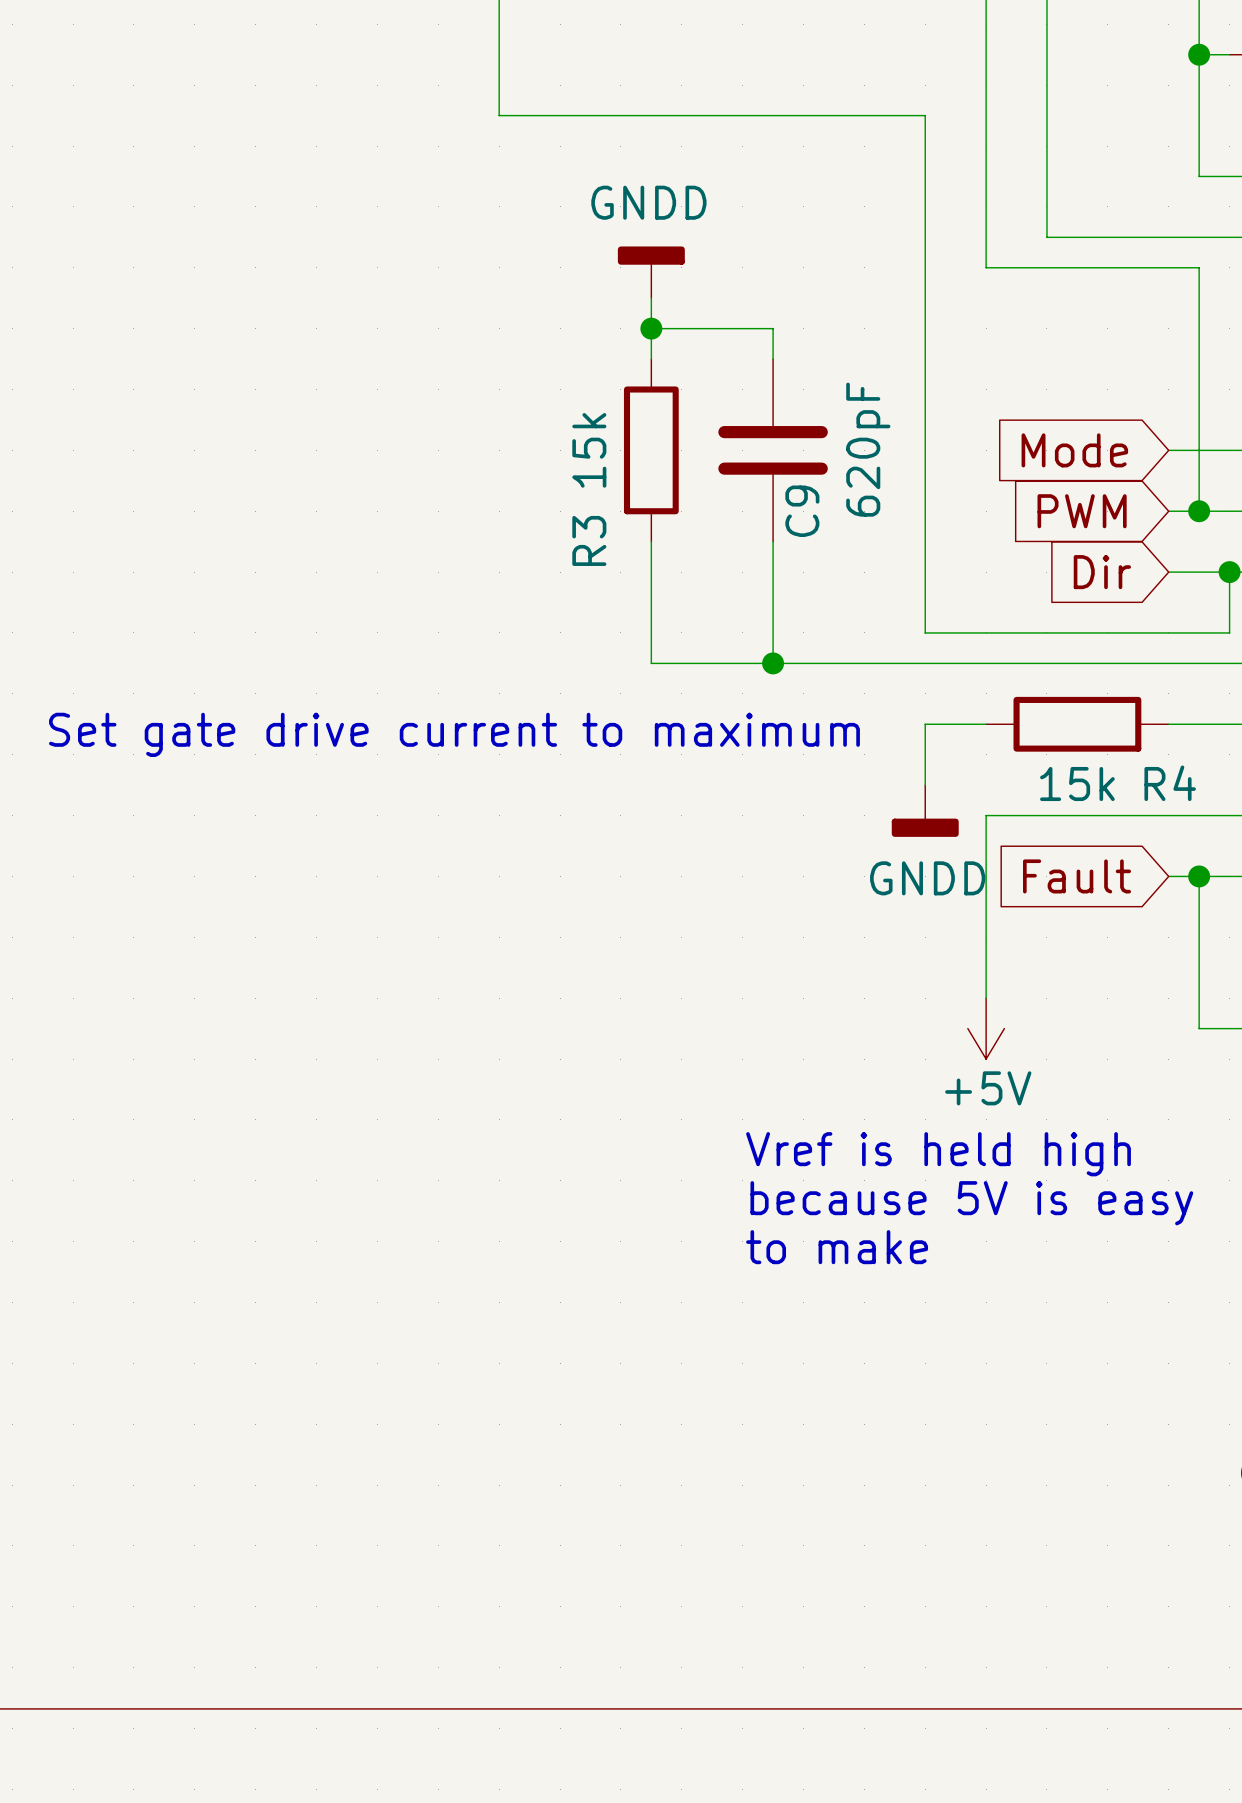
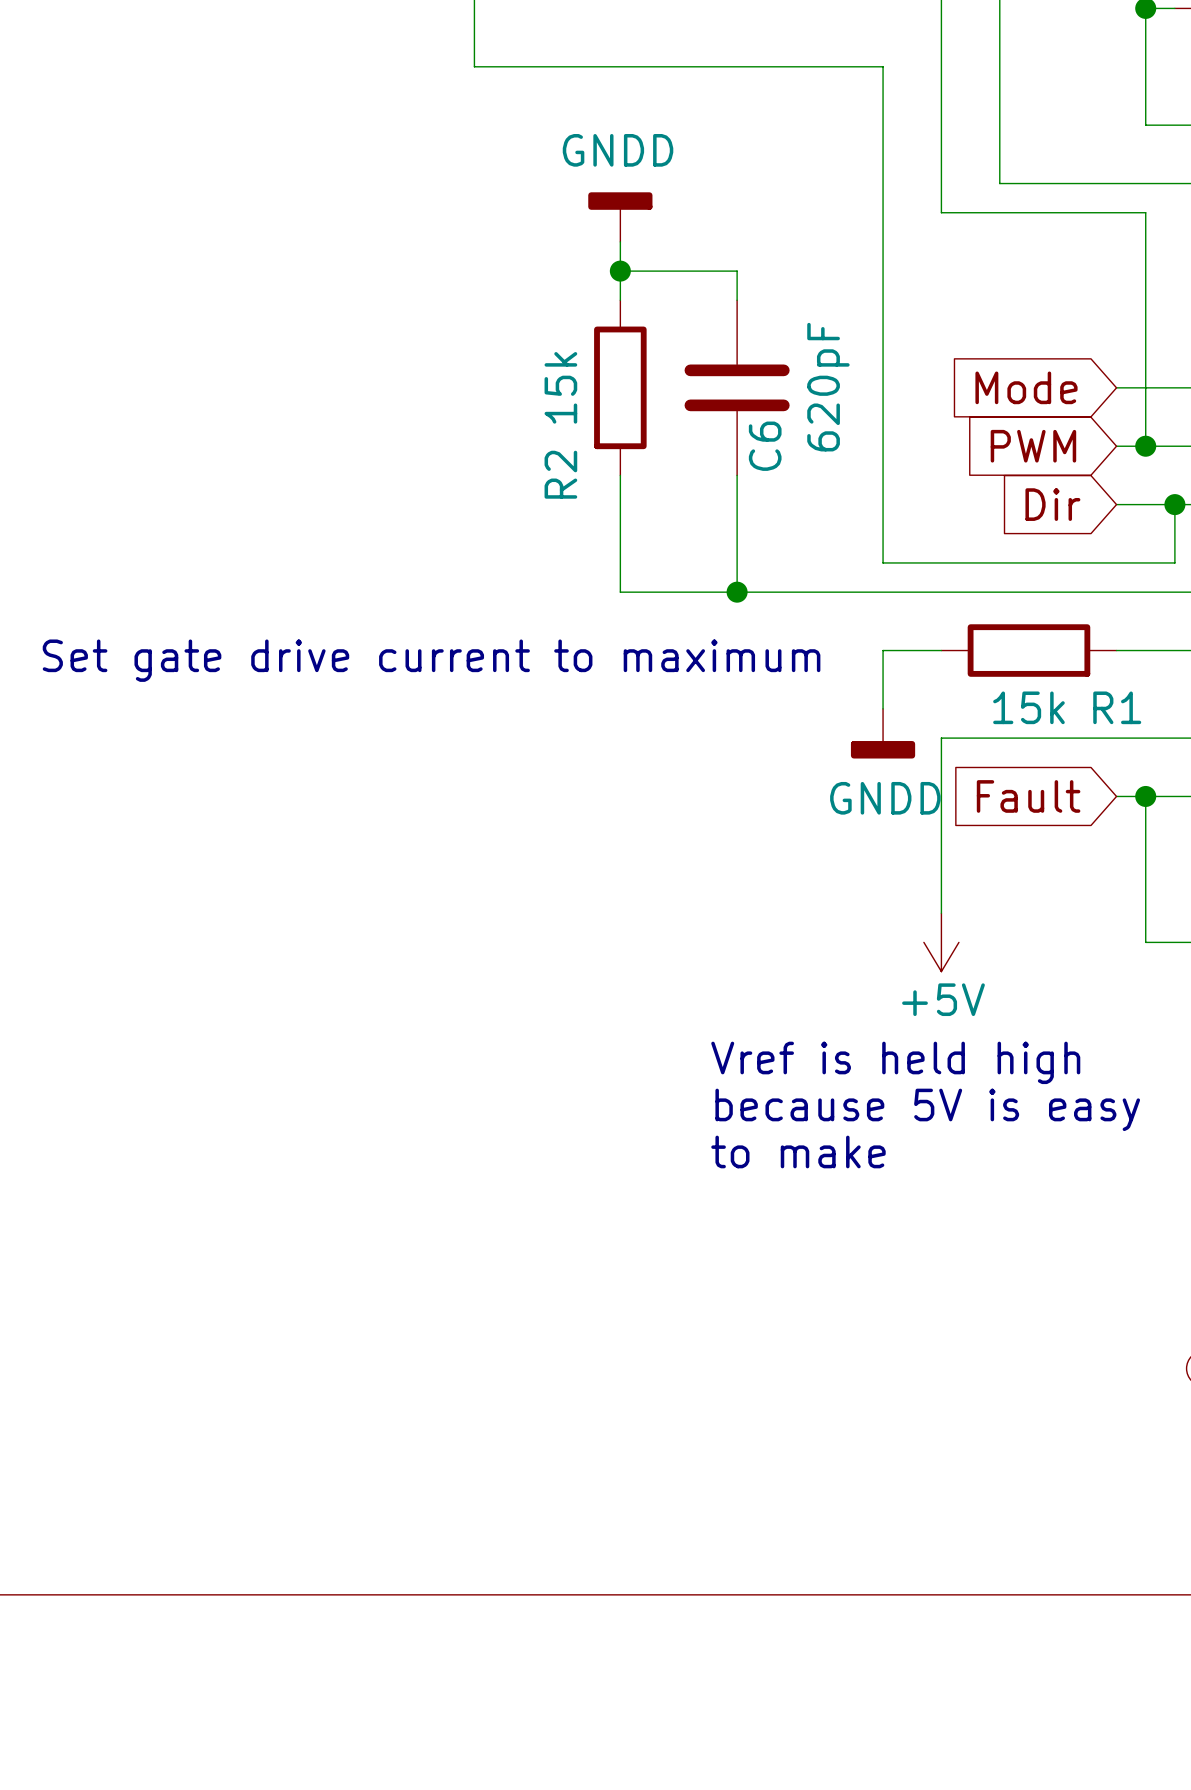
C9 name: C9 (802, 511) -> C6 (765, 446)
R3 name: R3 (589, 540) -> R2 (560, 474)
R4 name: R4 (1170, 783) -> R1 (1117, 707)

